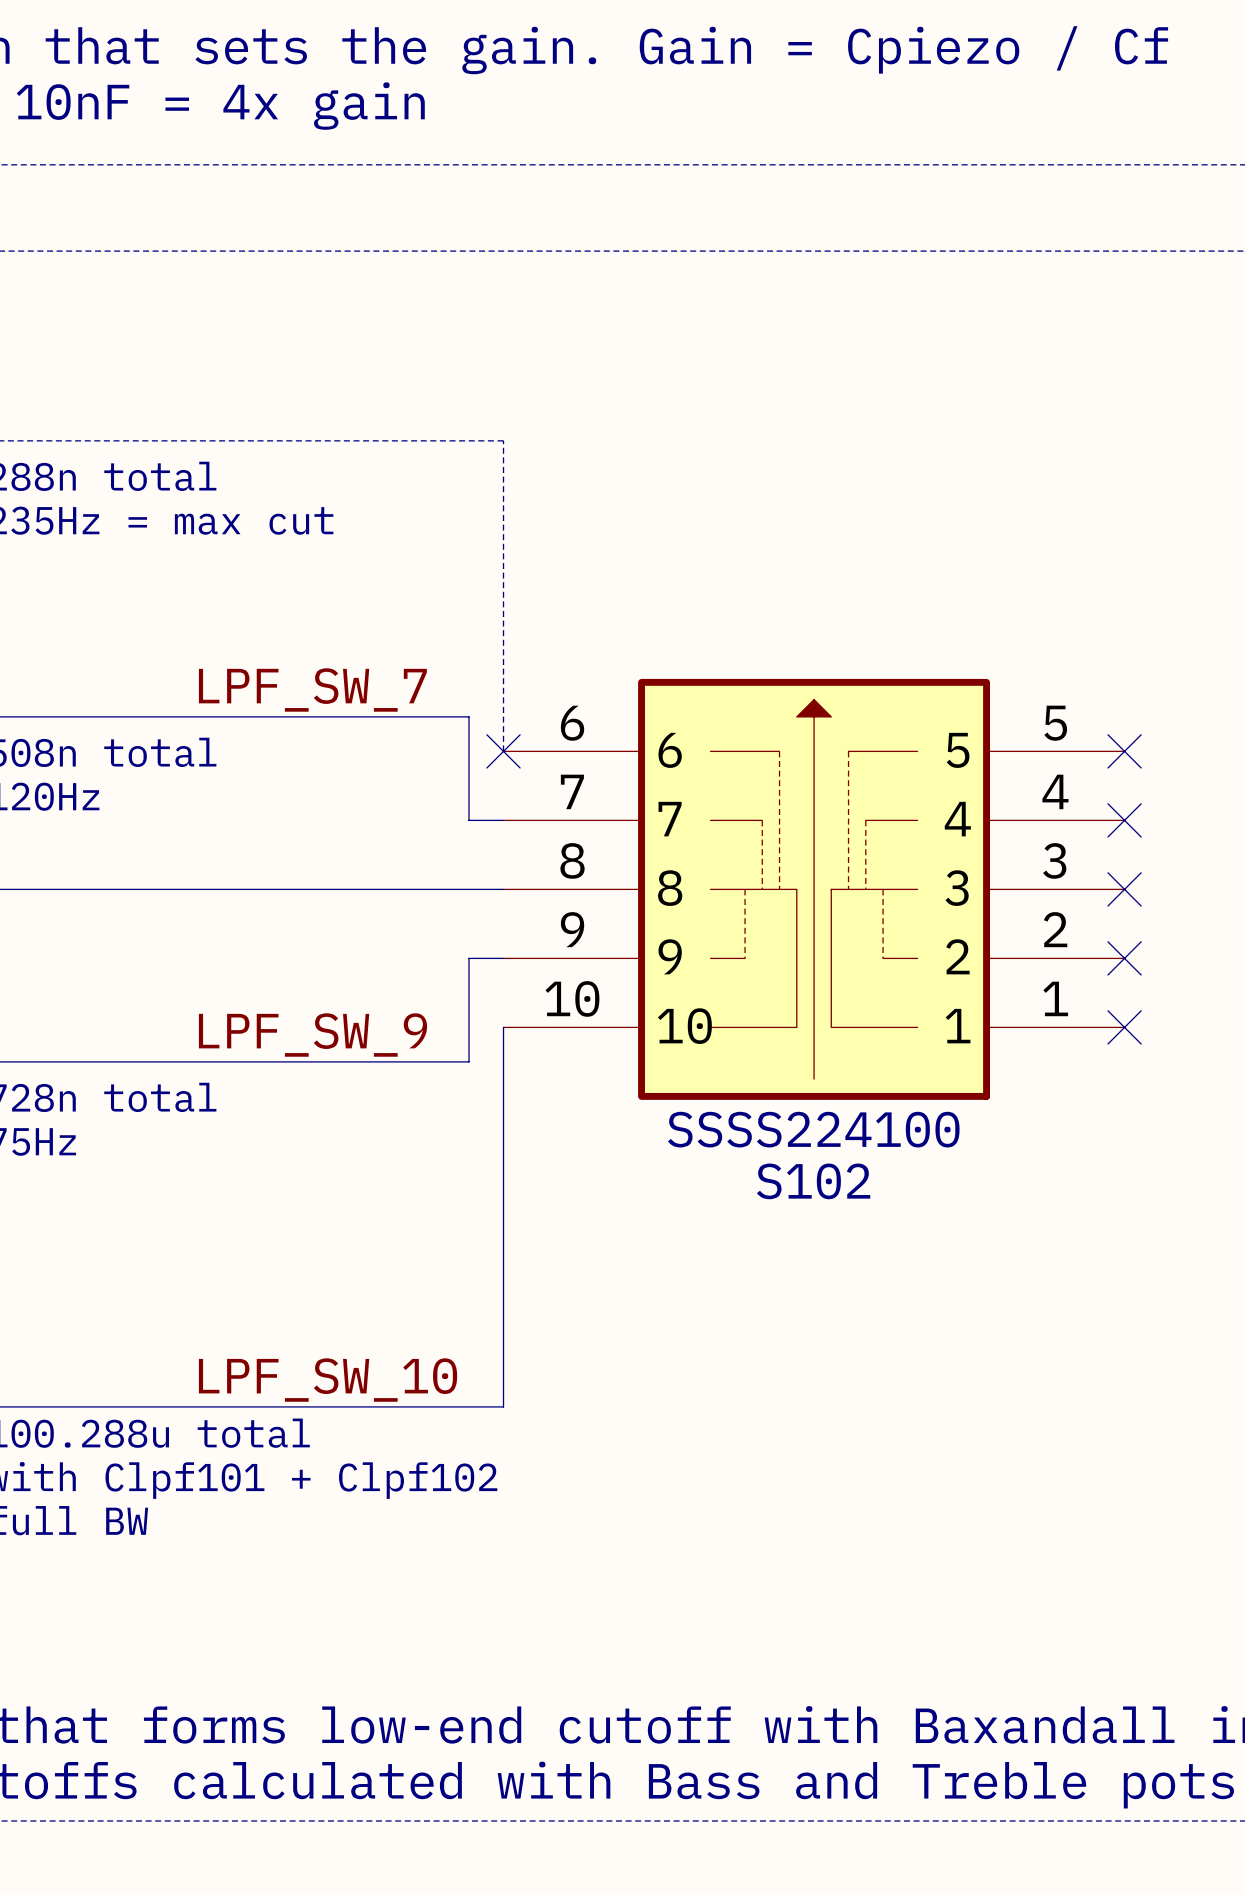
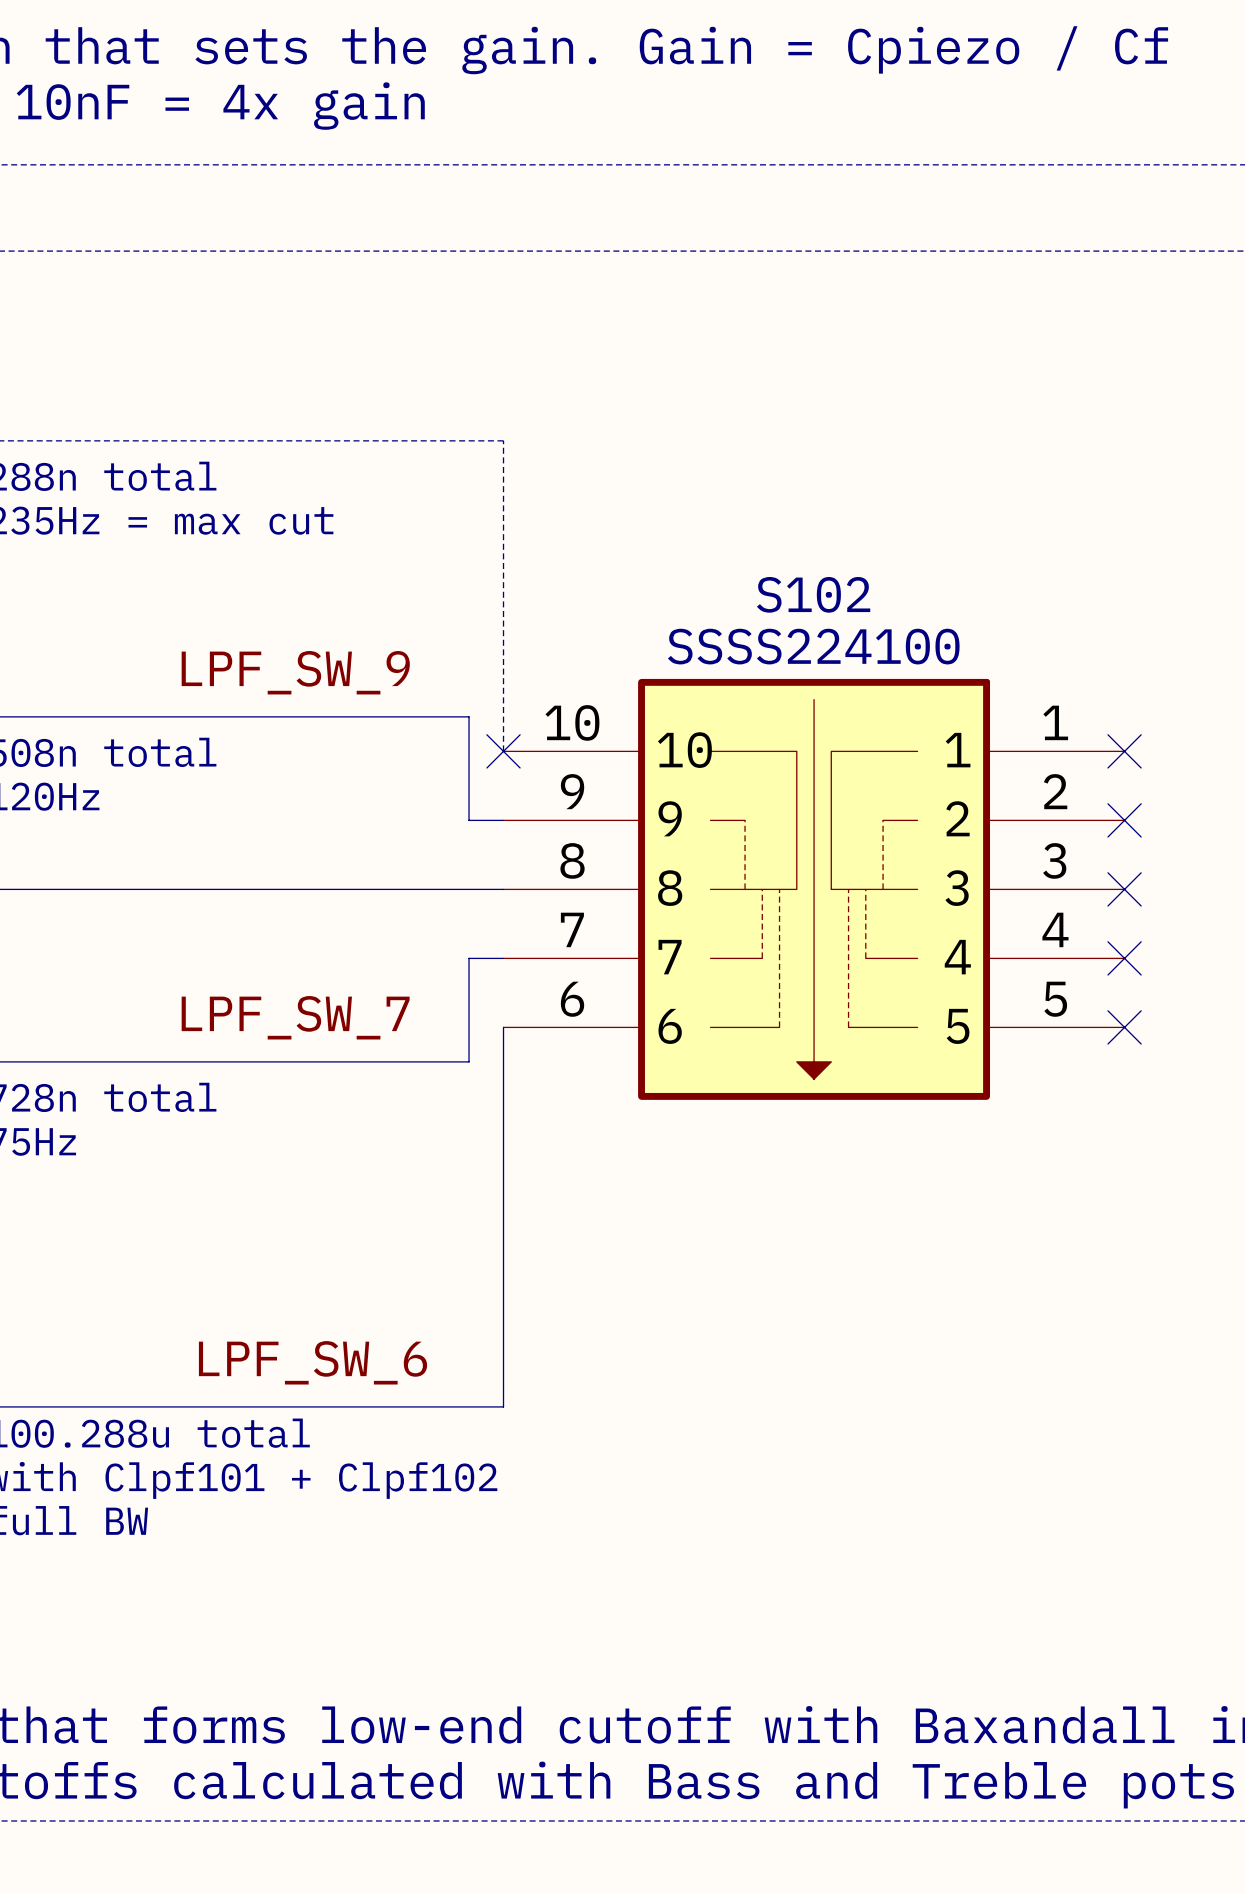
label position: LPF_SW_7 (312, 689) -> LPF_SW_7 (295, 1017)
S102 flip: as is (814, 889) -> up-down (814, 889)
label position: LPF_SW_9 (313, 1035) -> LPF_SW_9 (295, 672)
label: LPF_SW_10 (328, 1380) -> LPF_SW_6 (313, 1362)

